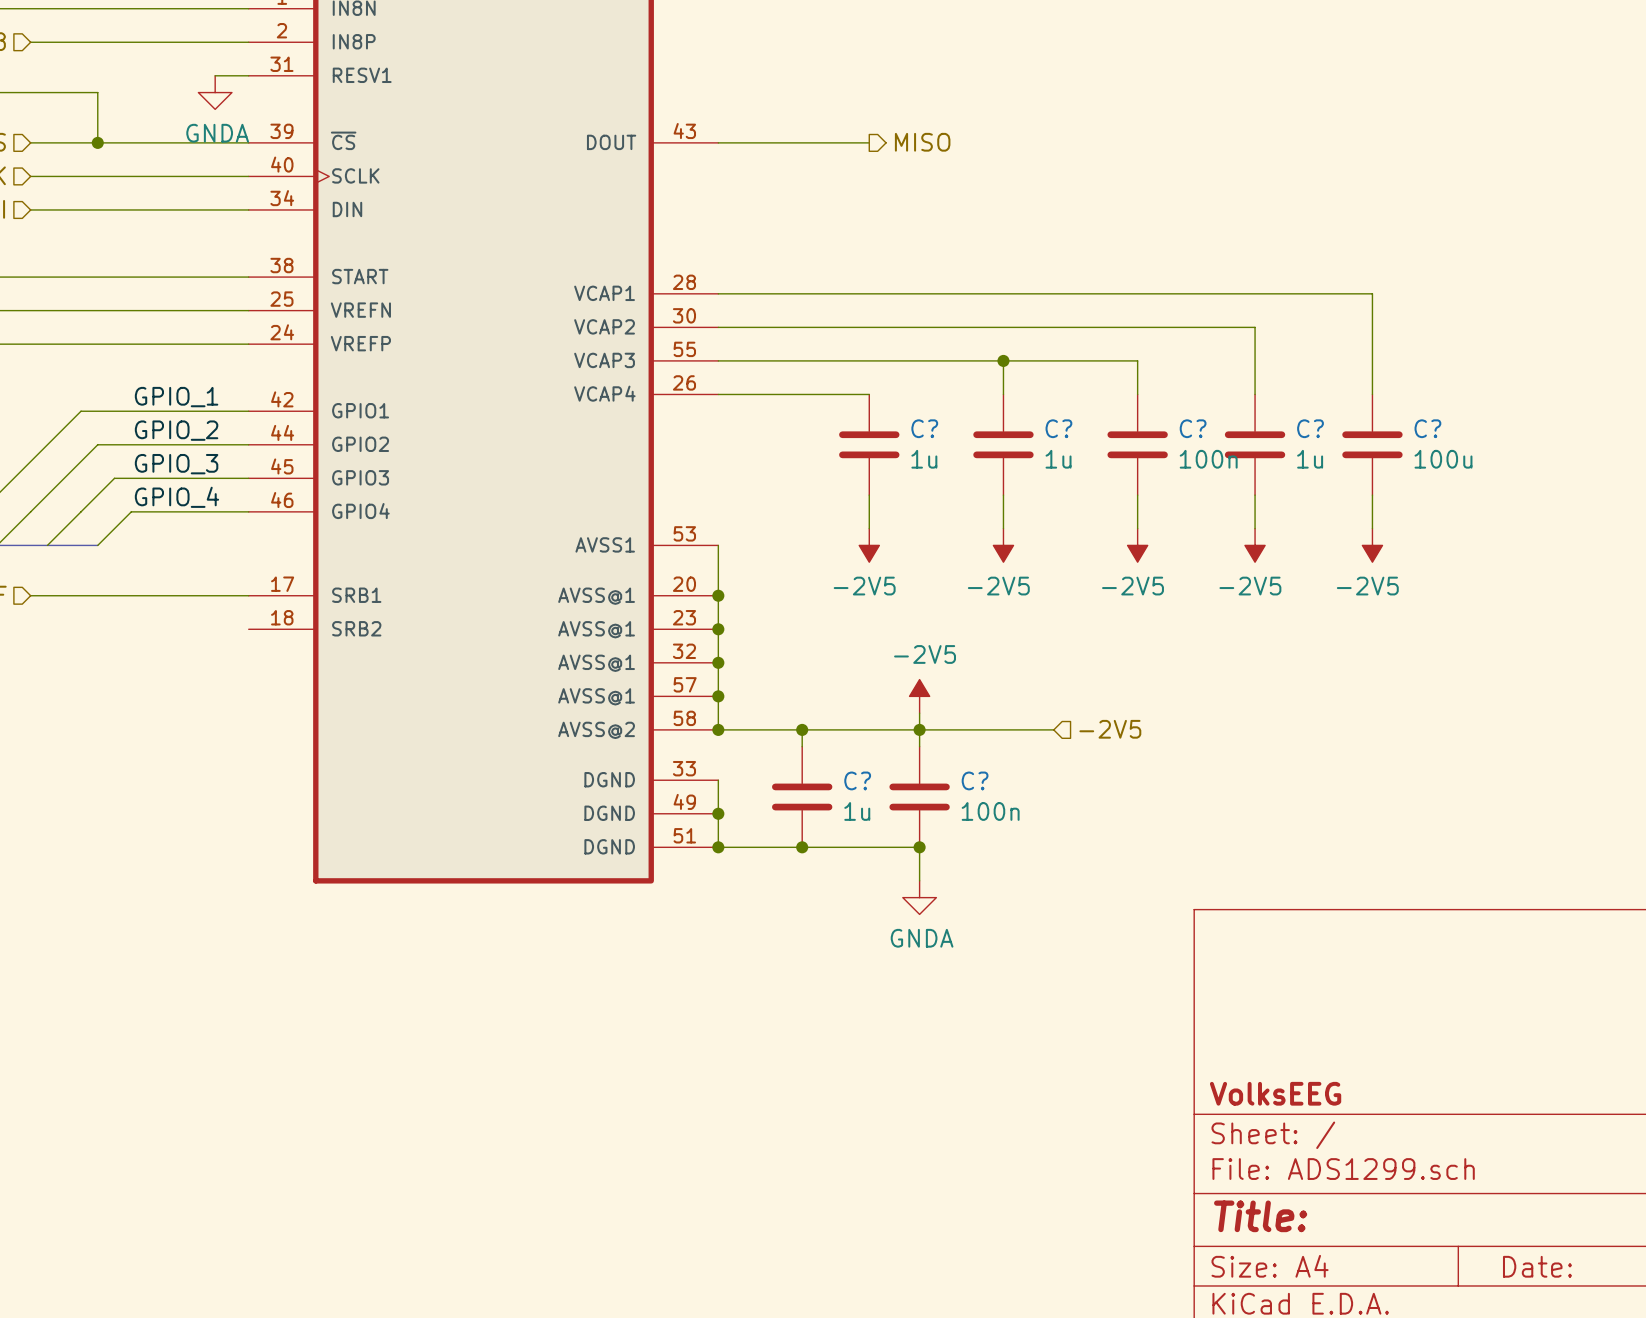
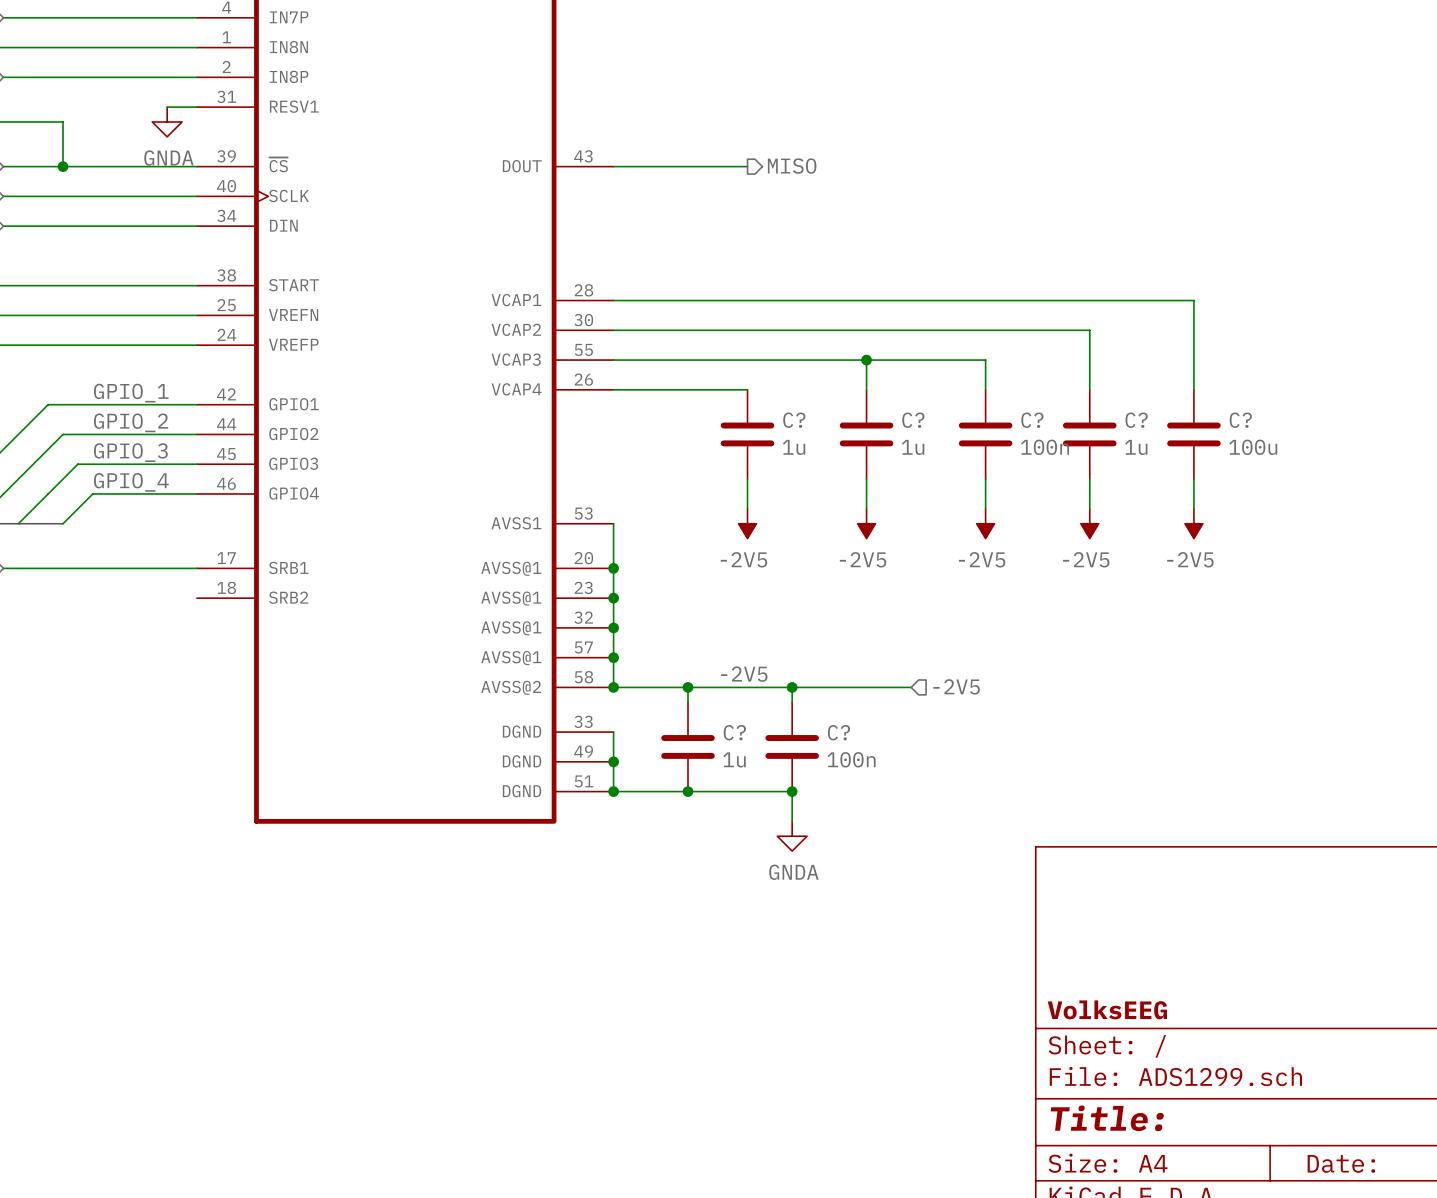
power symbol: -2V5 (919, 696) -> none
wire: (919, 713) (919, 729) -> none
label: none -> -2V5 (744, 674)

